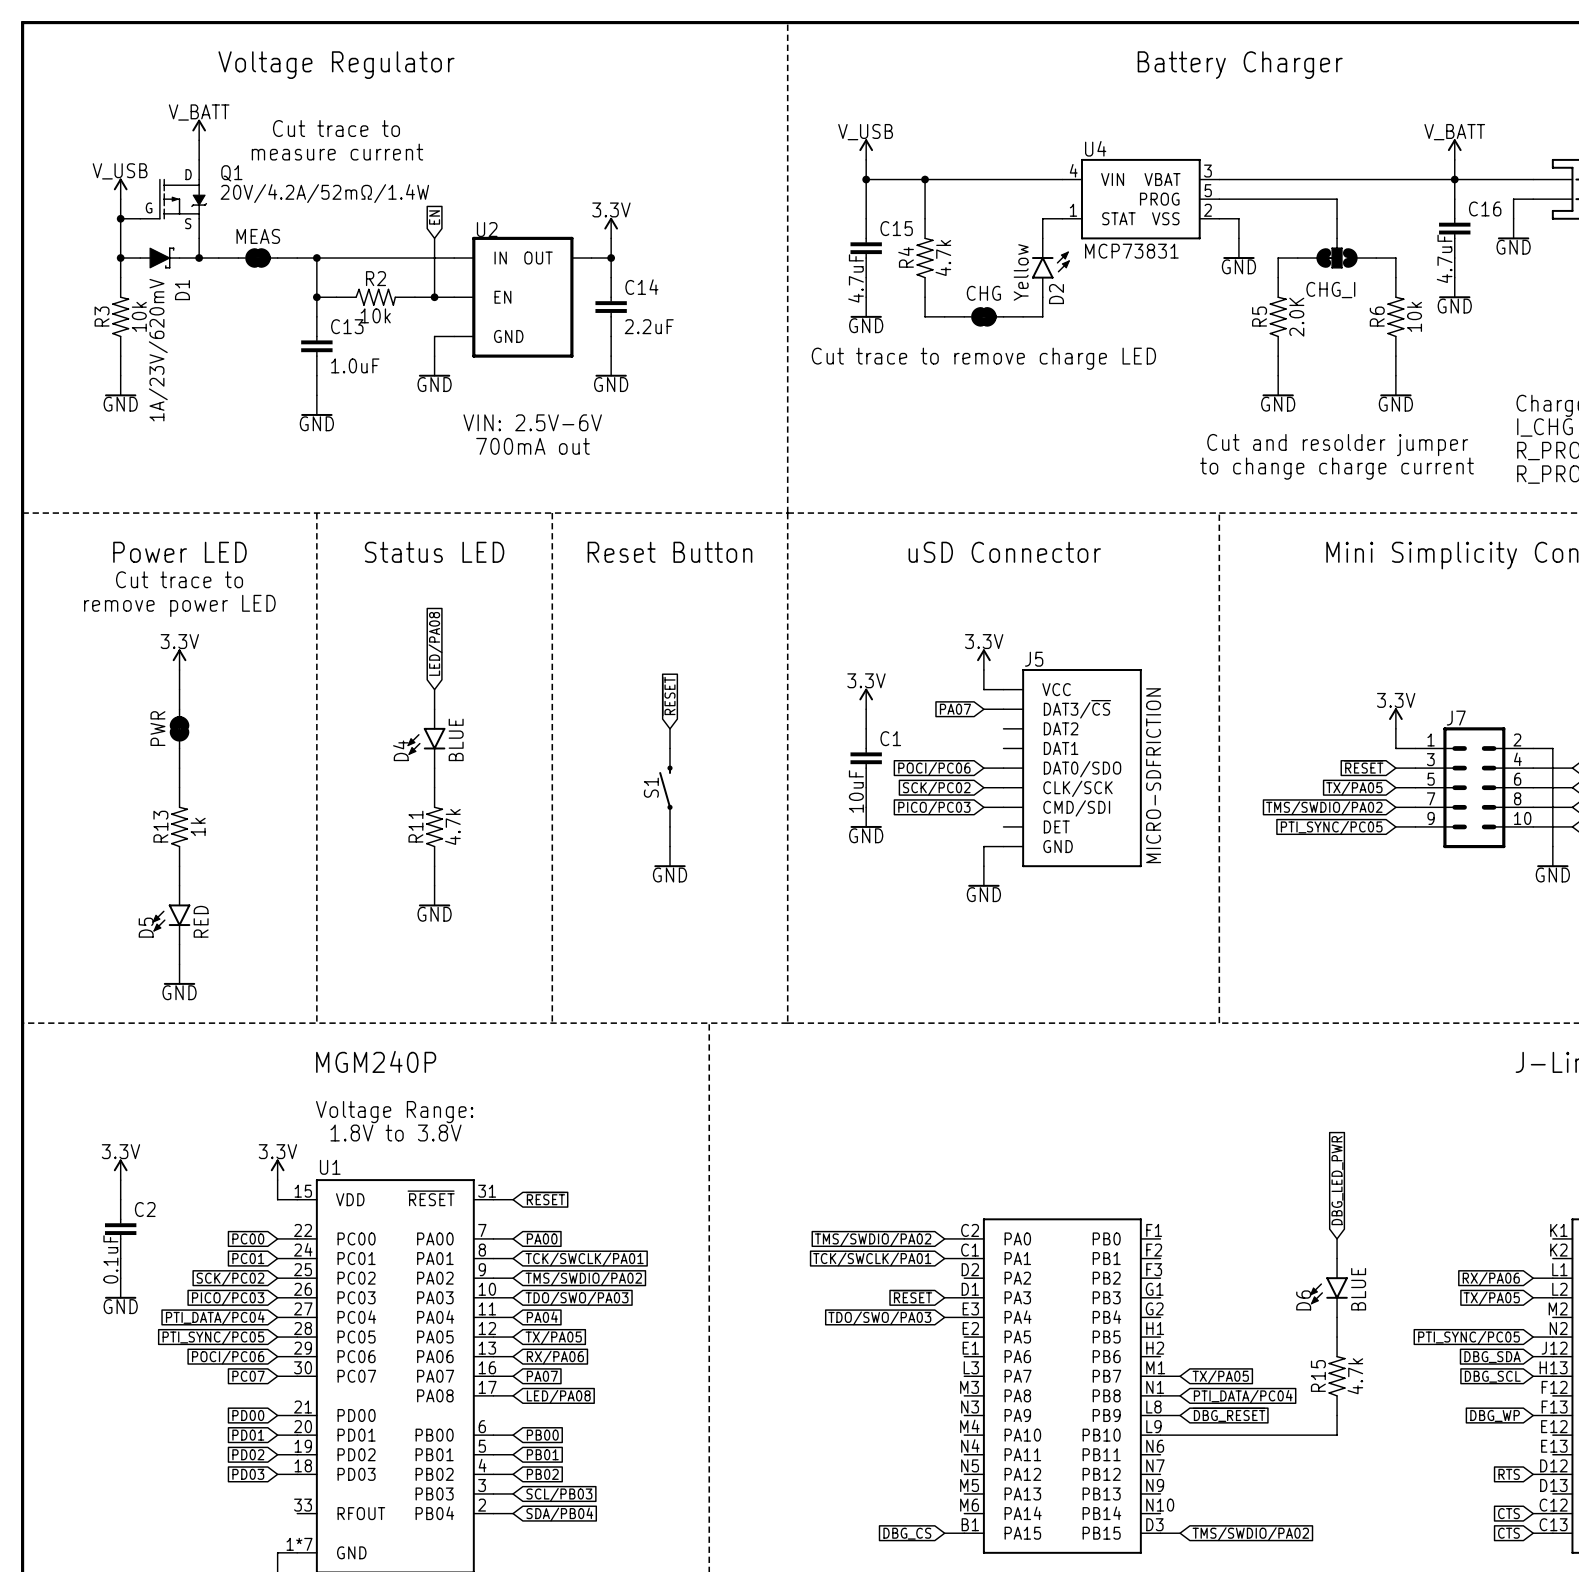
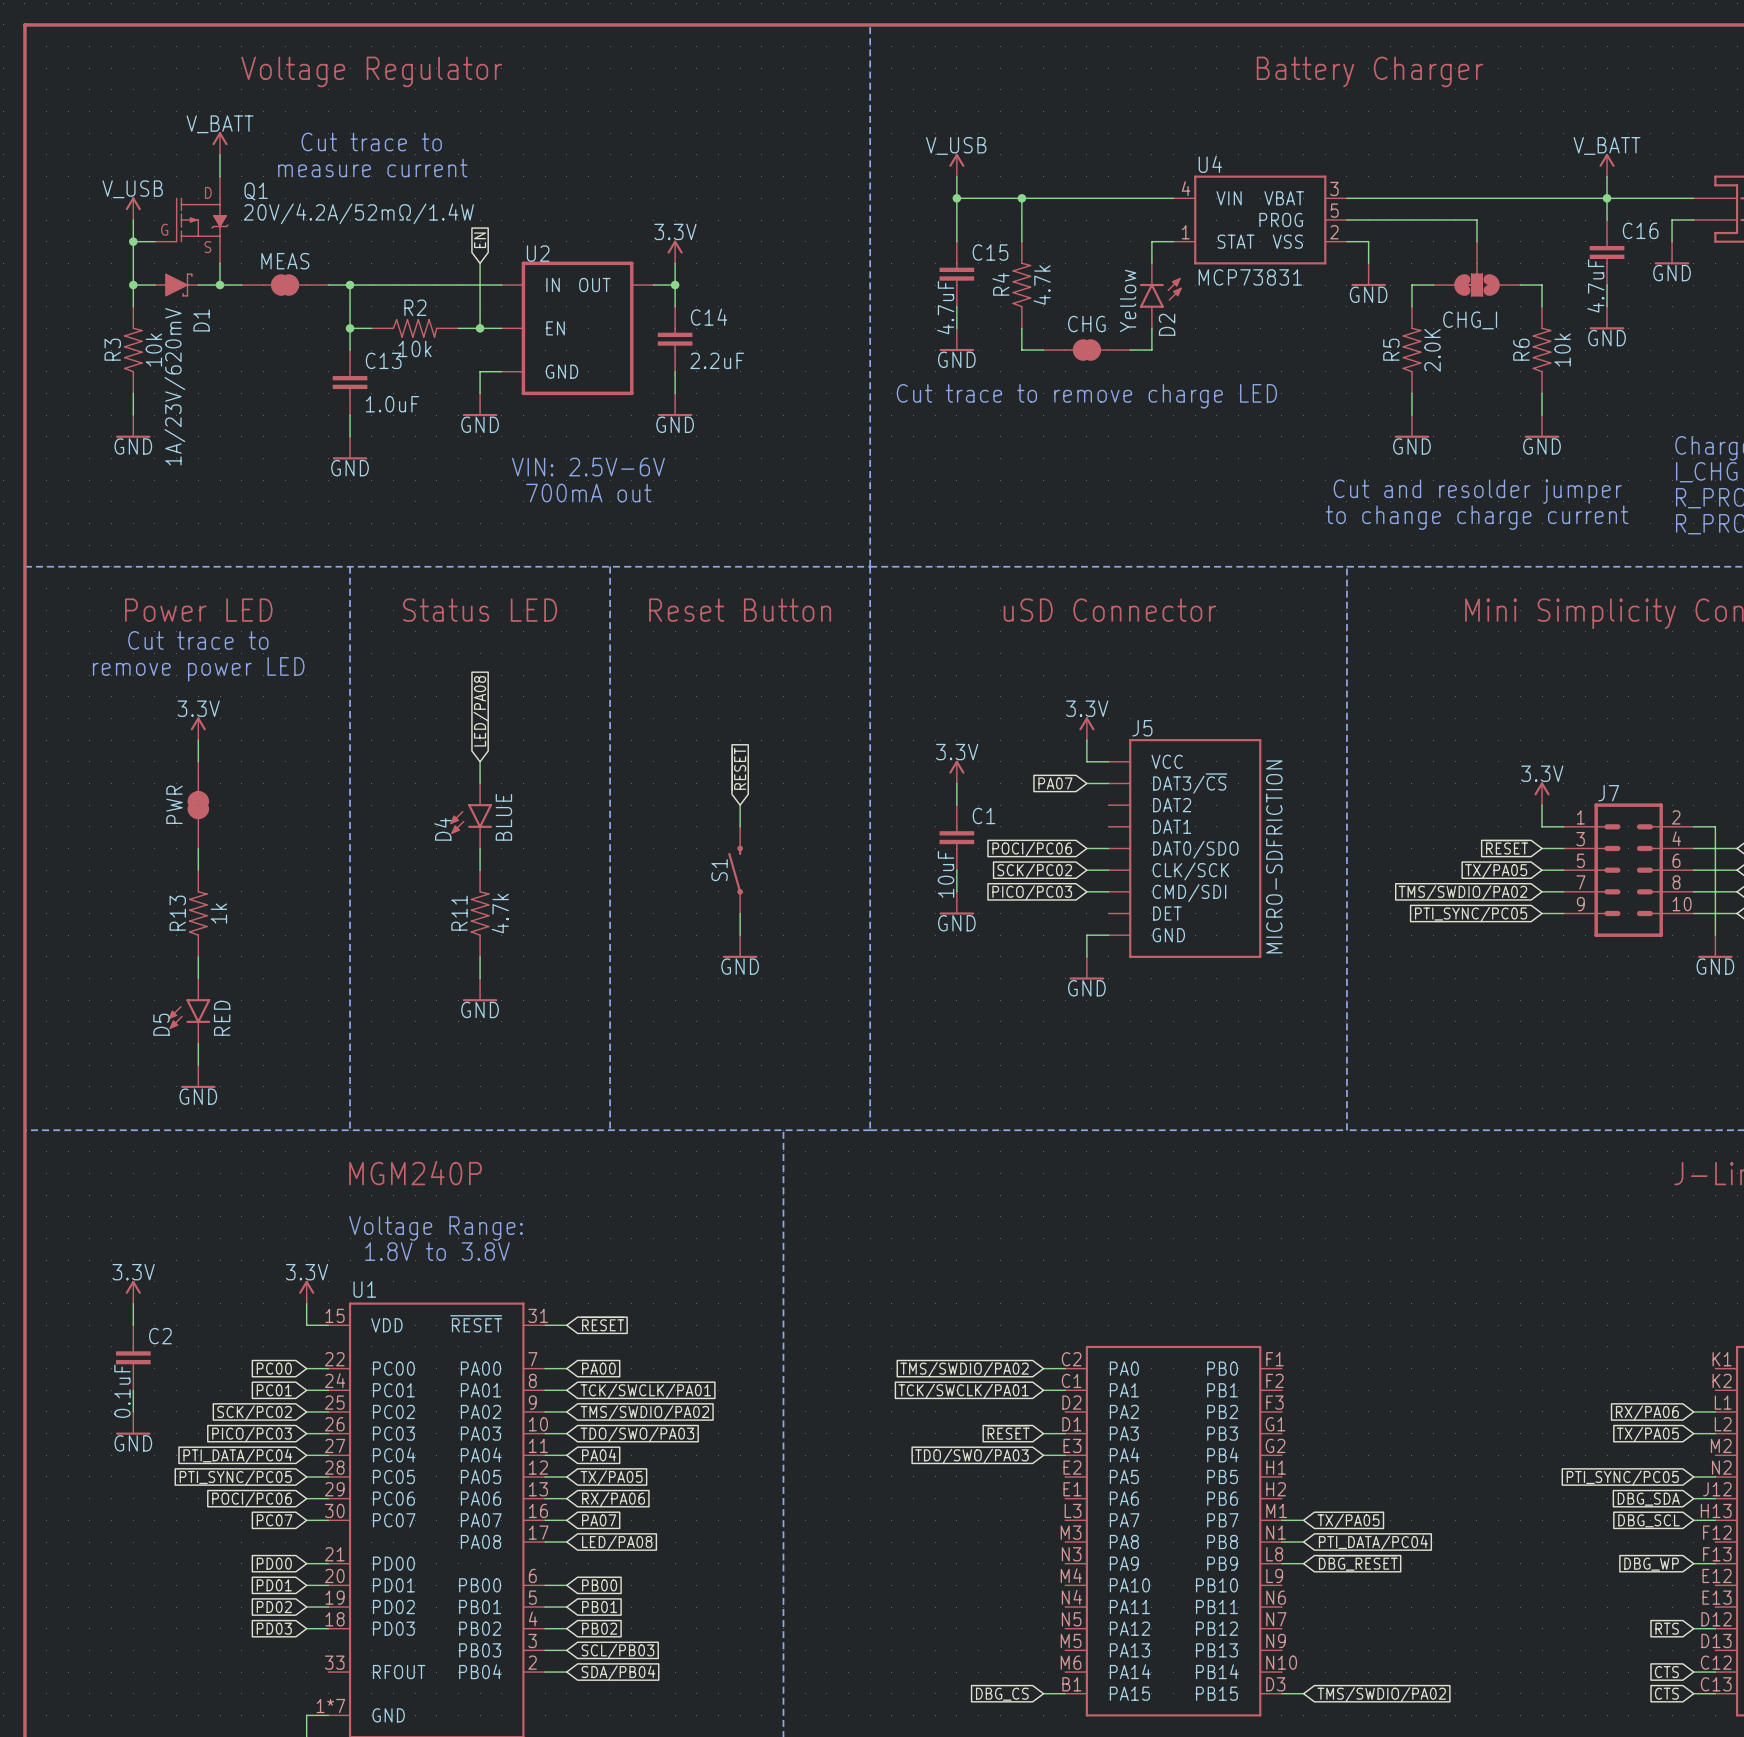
global label: DBG_LED_PWR (1337, 1180) -> none
wire: (1337, 1238) (1337, 1258) -> none
D6: BLUE (1328, 1287) -> none
wire: (1337, 1317) (1337, 1337) -> none
R15: 4.7k (1337, 1376) -> none
wire: (1337, 1415) (1337, 1435) (1160, 1435) -> none

